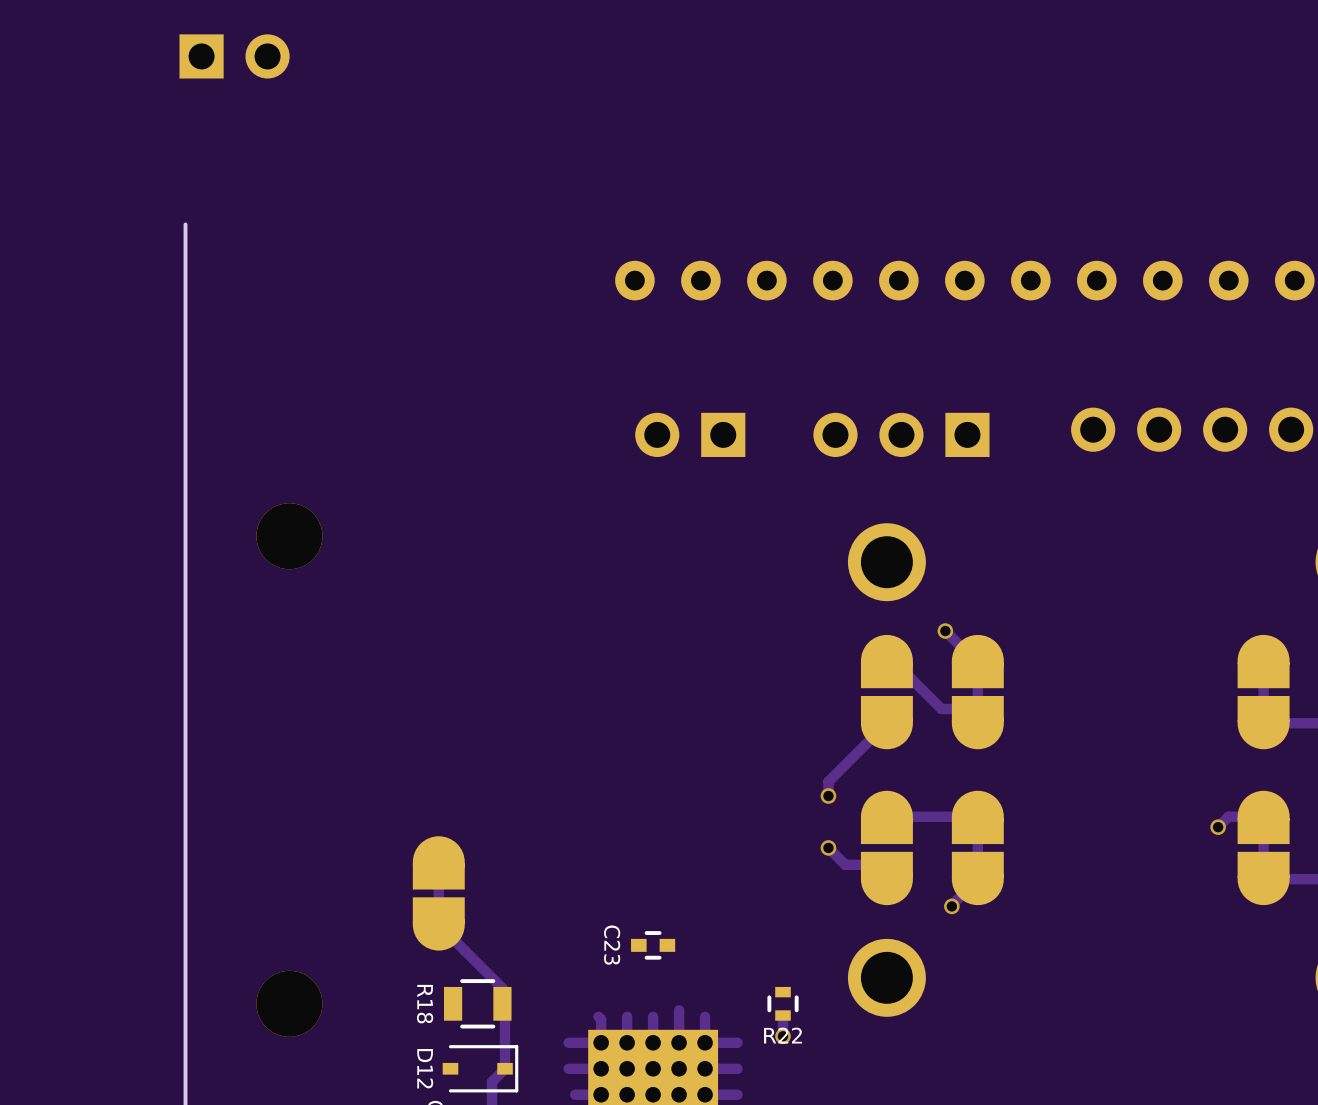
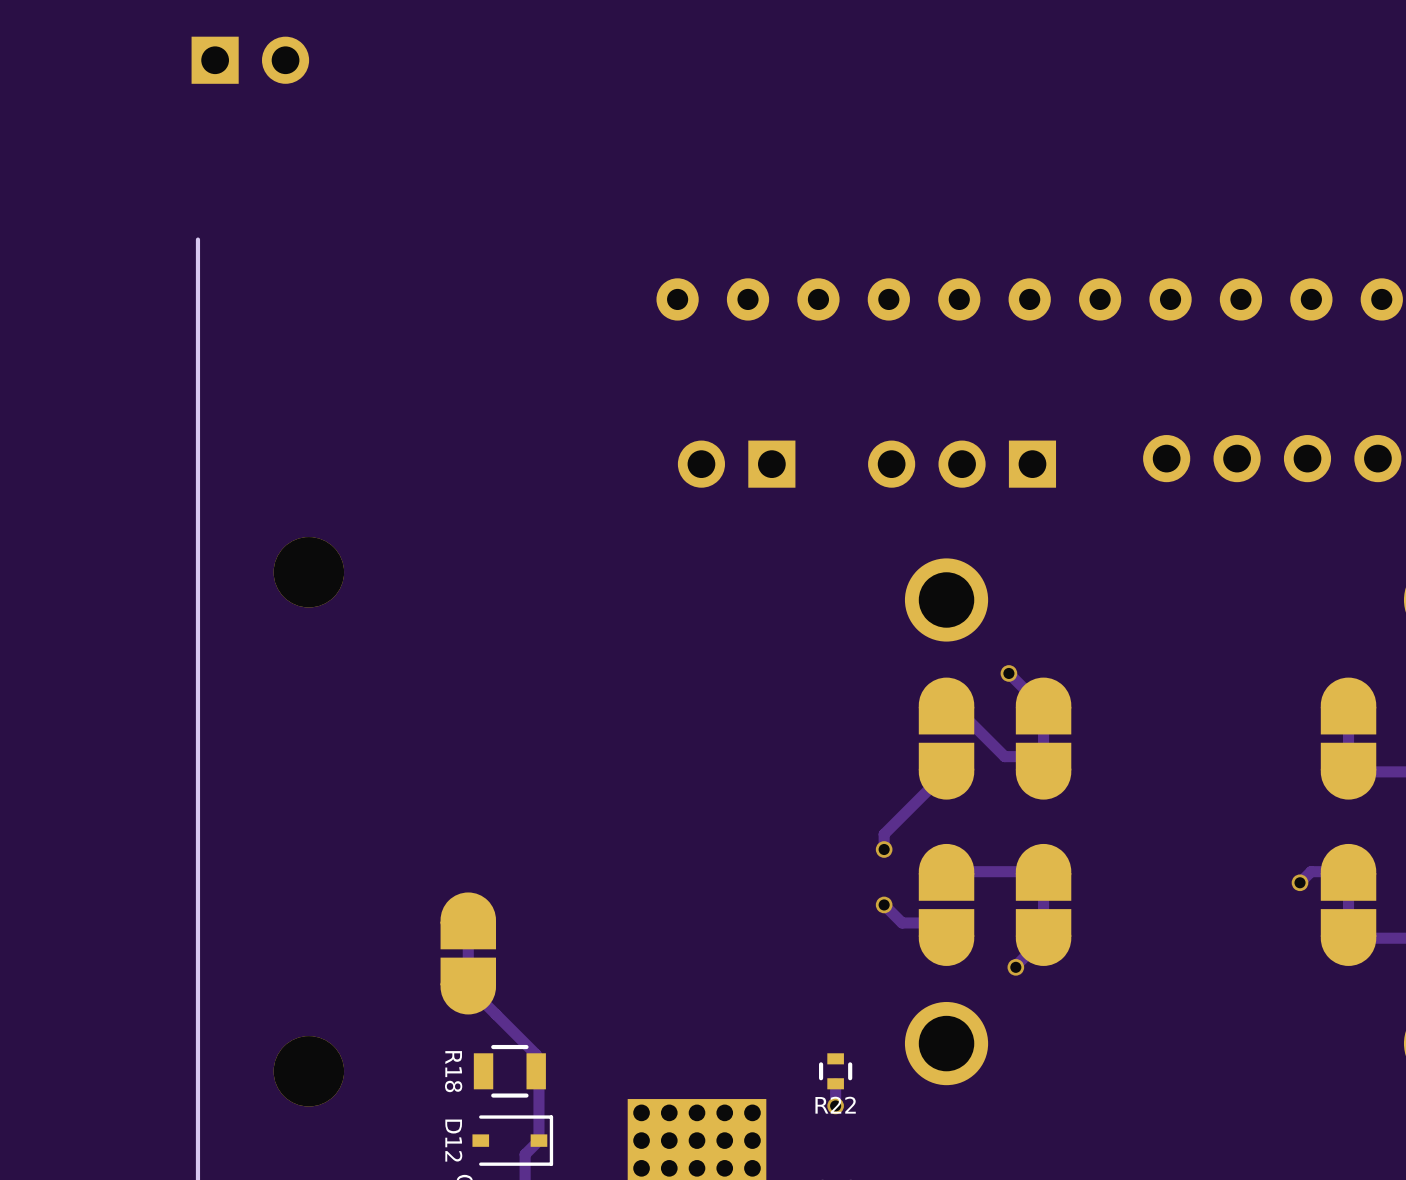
C23: (653, 945) -> none
track: (679, 1010) (679, 1042) -> none
track: (598, 1016) (601, 1019) (601, 1042) (568, 1042) -> none
track: (627, 1016) (627, 1042) -> none
track: (653, 1016) (653, 1042) -> none
track: (705, 1016) (705, 1042) (737, 1042) -> none
track: (601, 1068) (568, 1068) -> none
track: (737, 1068) (705, 1068) -> none
track: (601, 1094) (575, 1094) -> none
track: (737, 1094) (705, 1094) -> none

